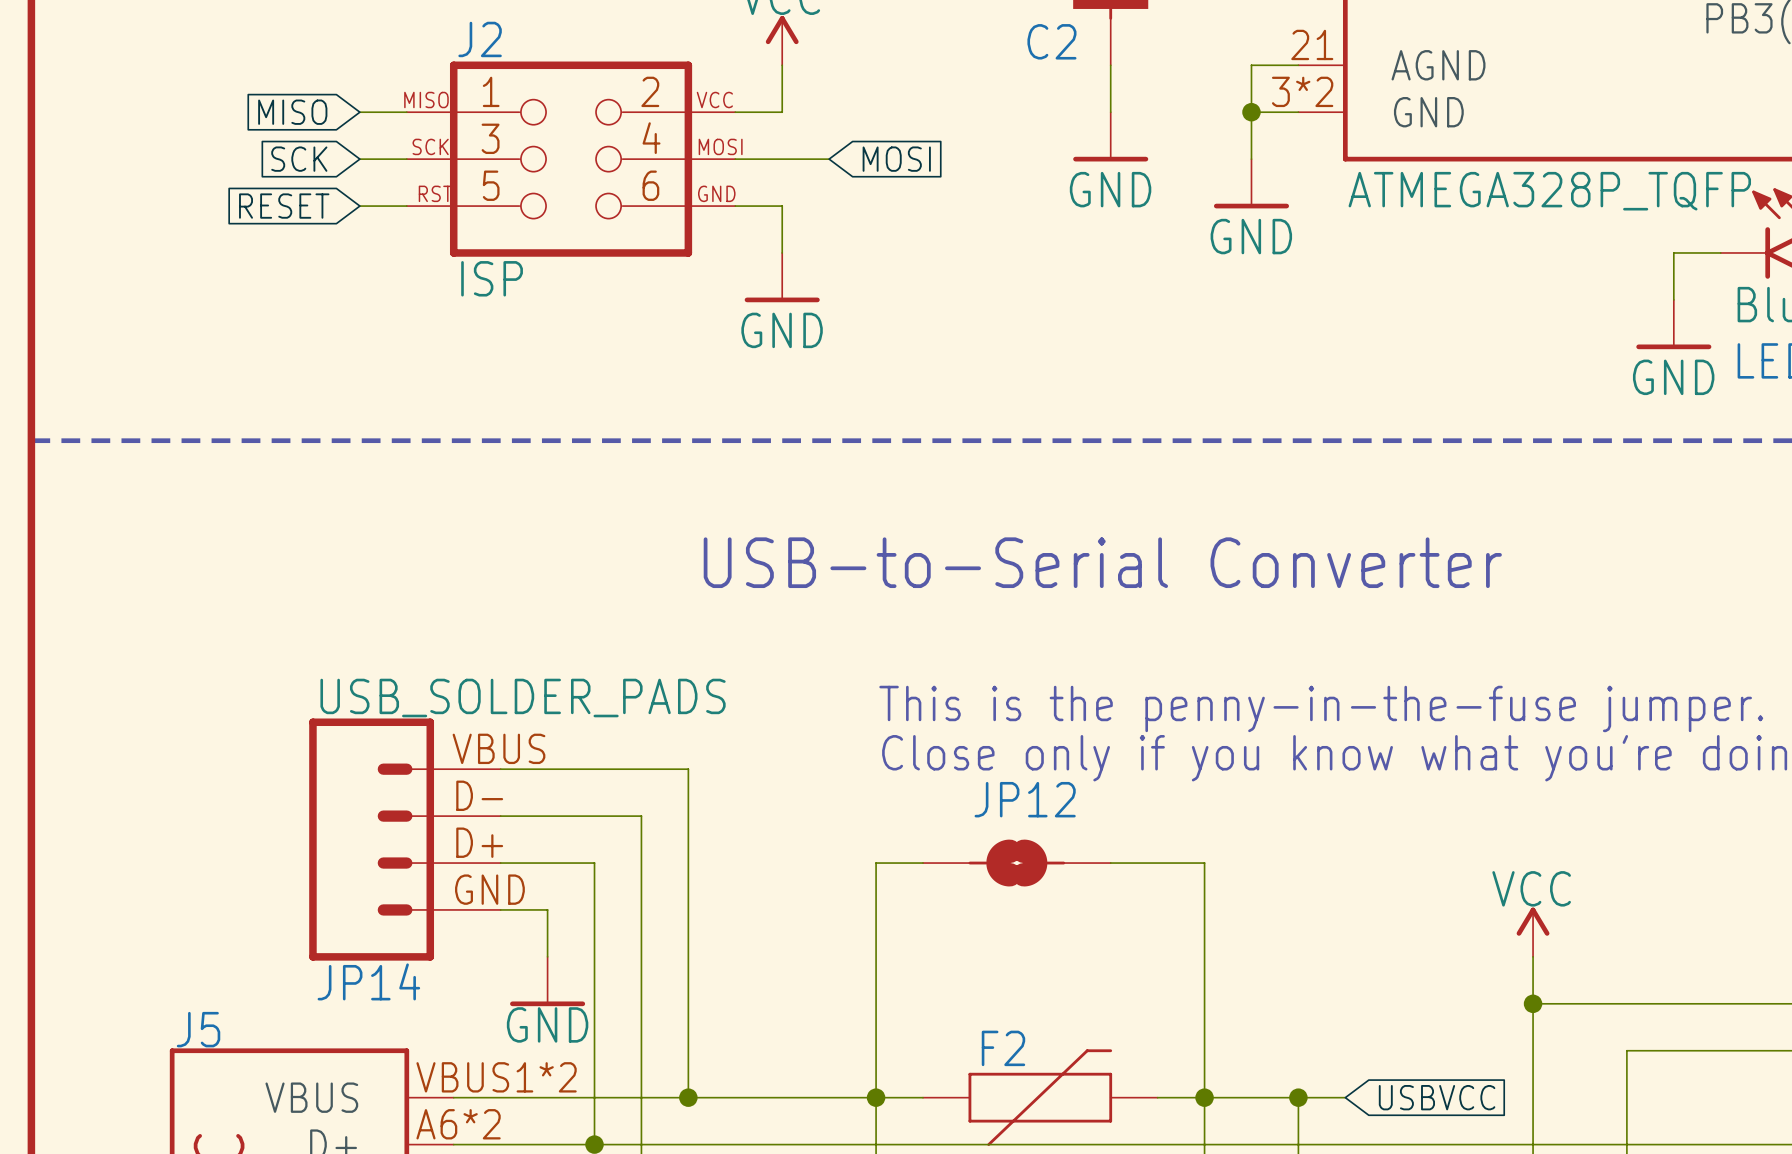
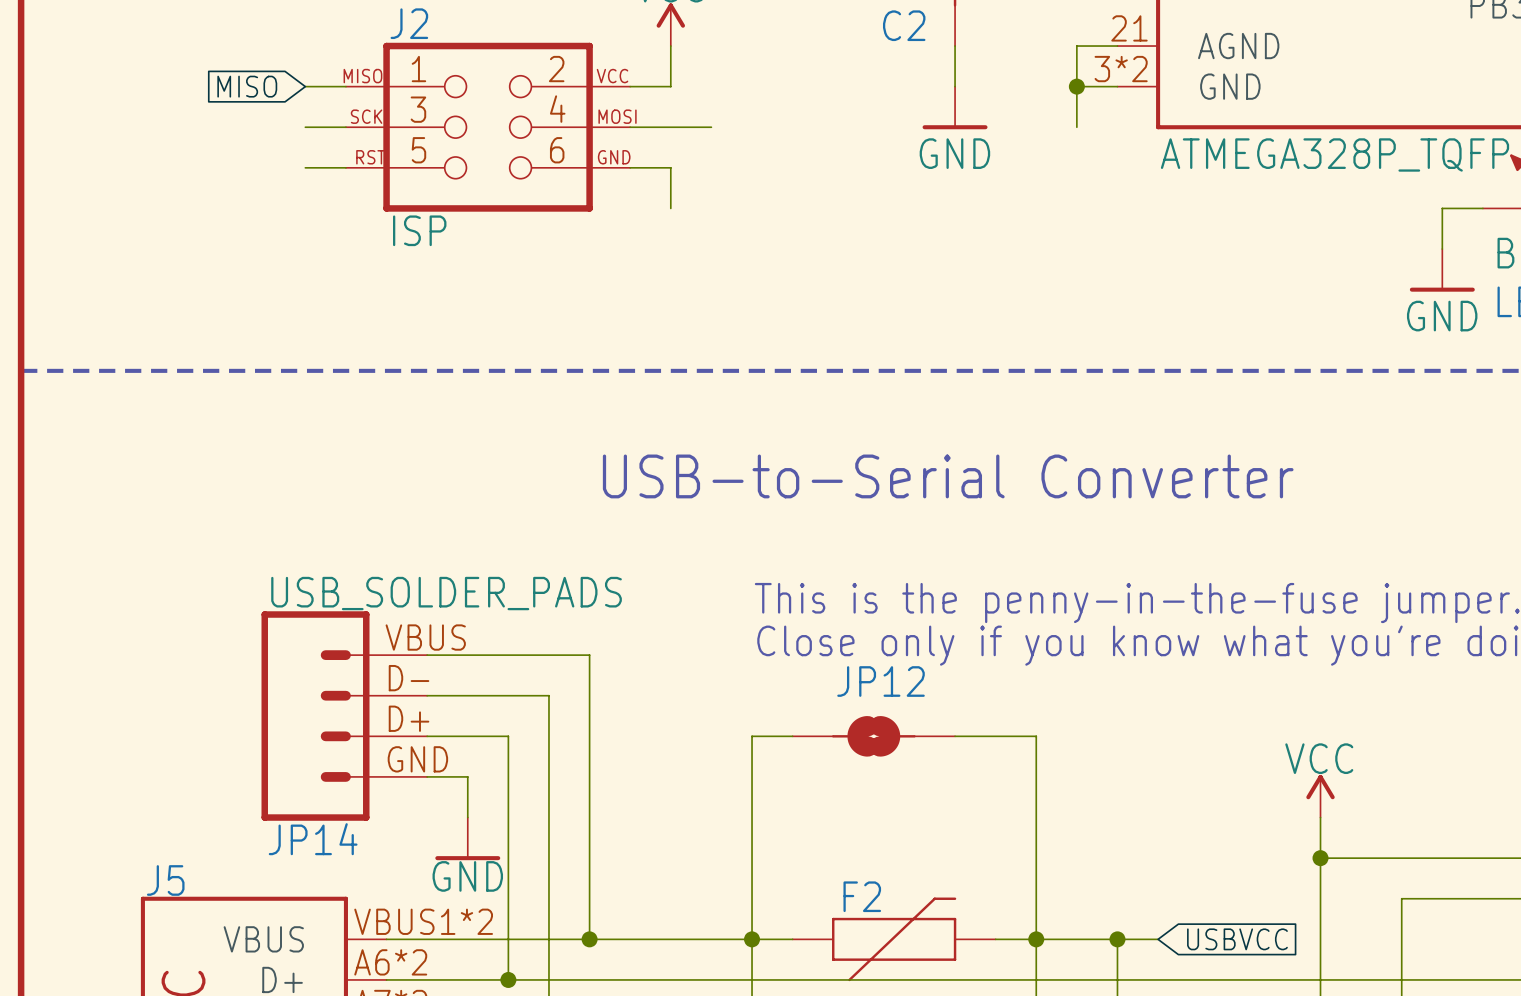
global label: SCK (299, 159) -> none
global label: MOSI (896, 159) -> none
power symbol: GND (1251, 183) -> none
global label: RESET (284, 206) -> none
power symbol: GND (782, 277) -> none

